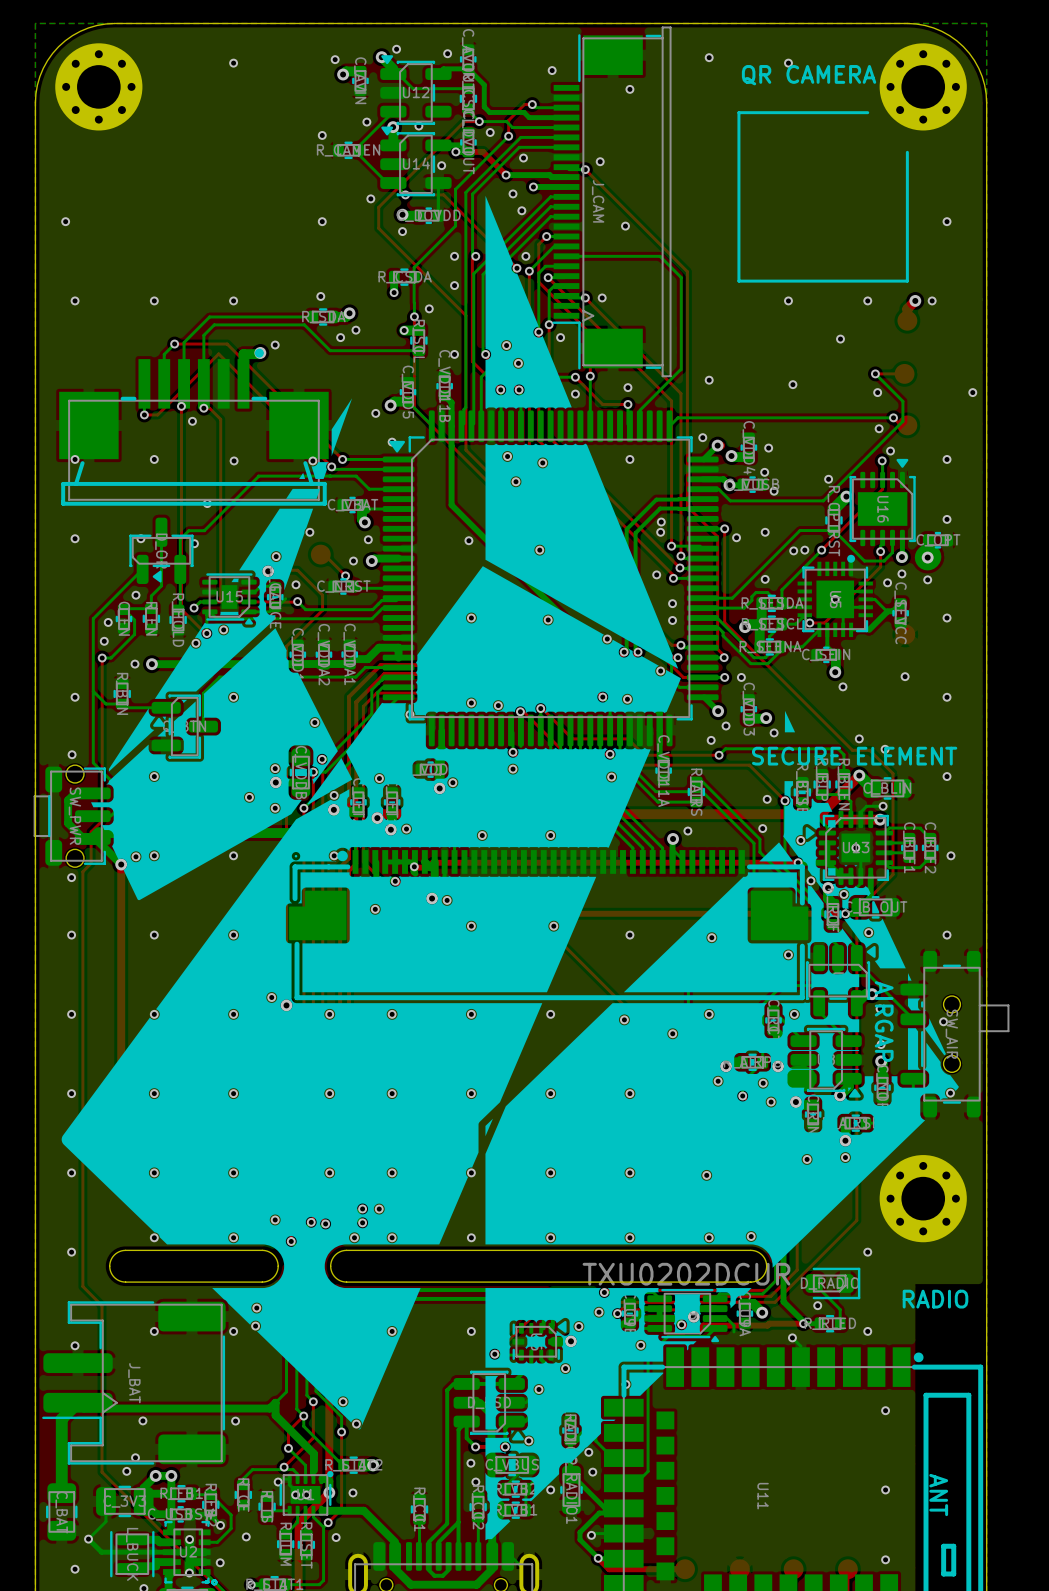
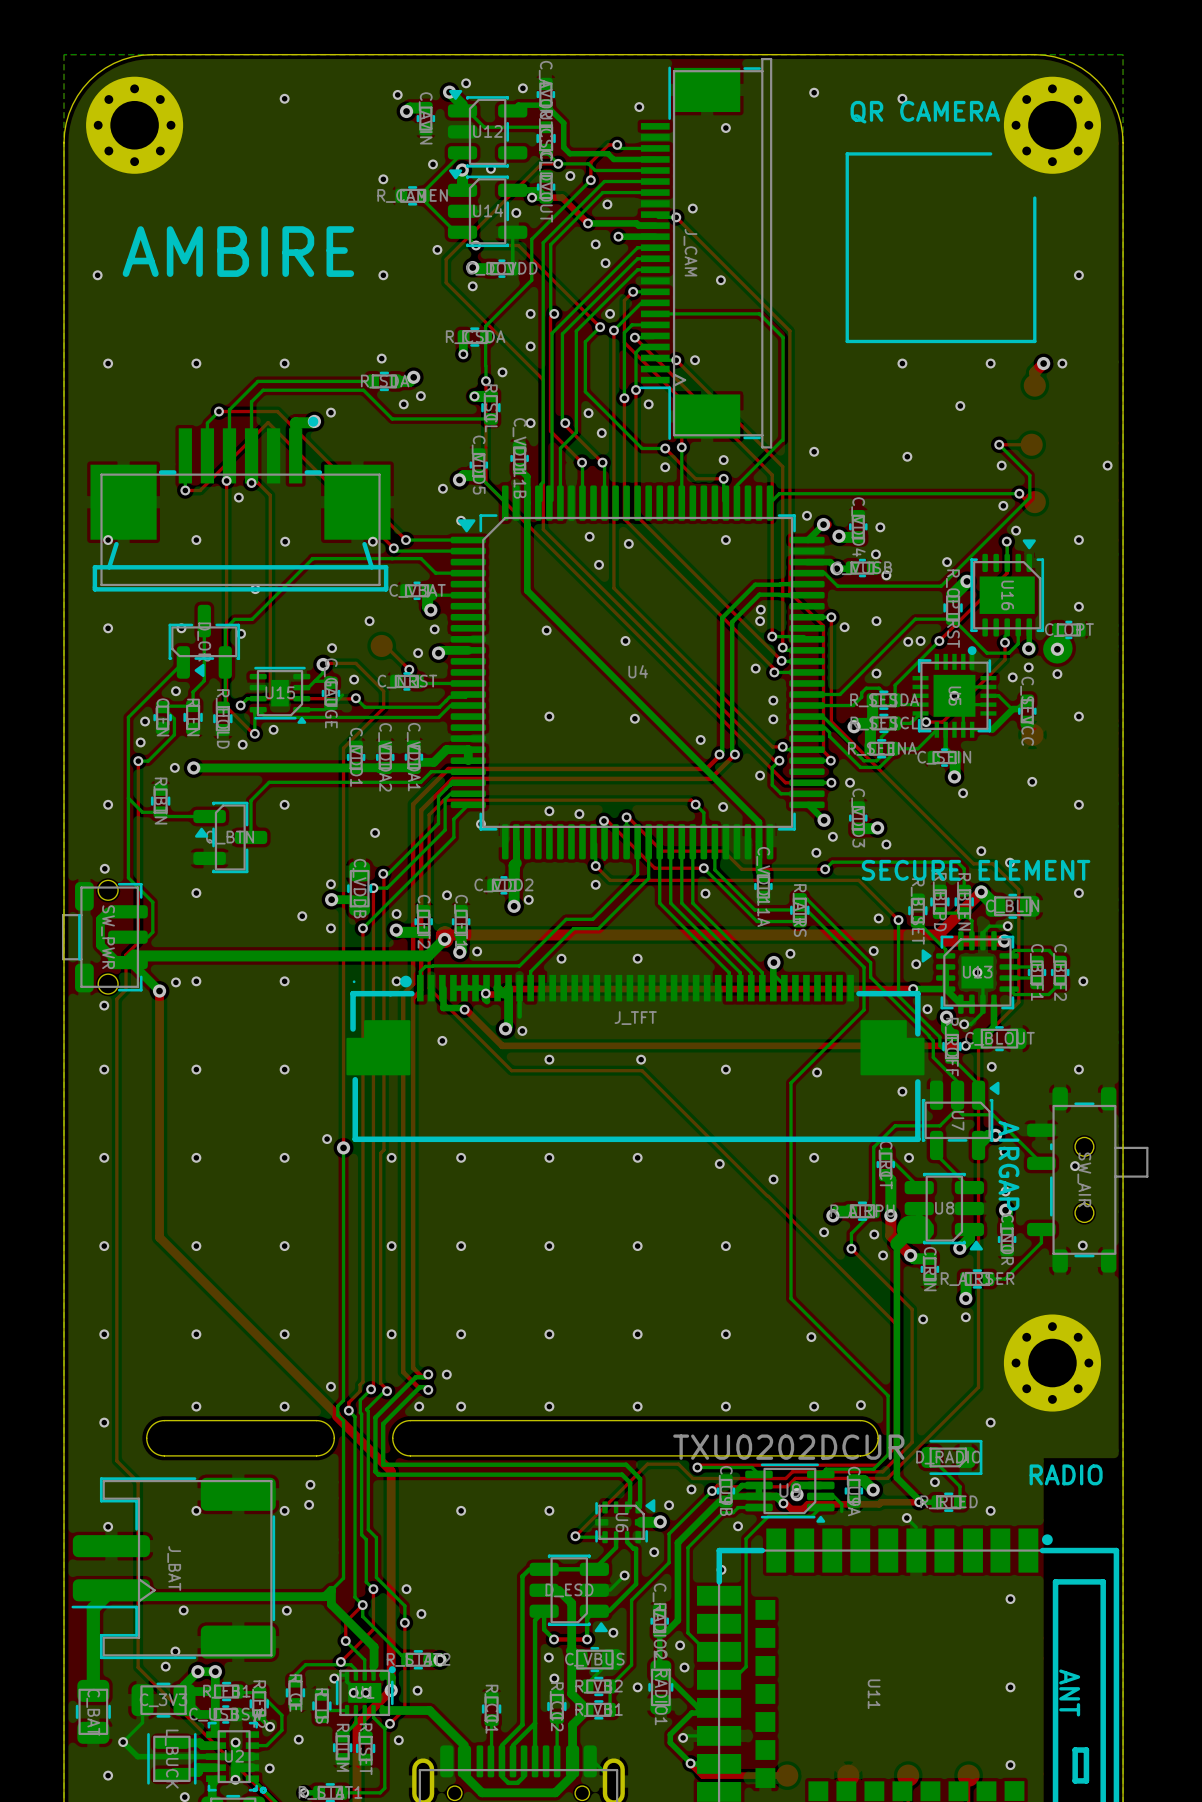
drawing: [485, 195, 572, 410] -> none
text: none -> AMBIRE (238, 251)
drawing: [61, 398, 959, 1541] -> none
drawing: [784, 710, 796, 733] -> none

